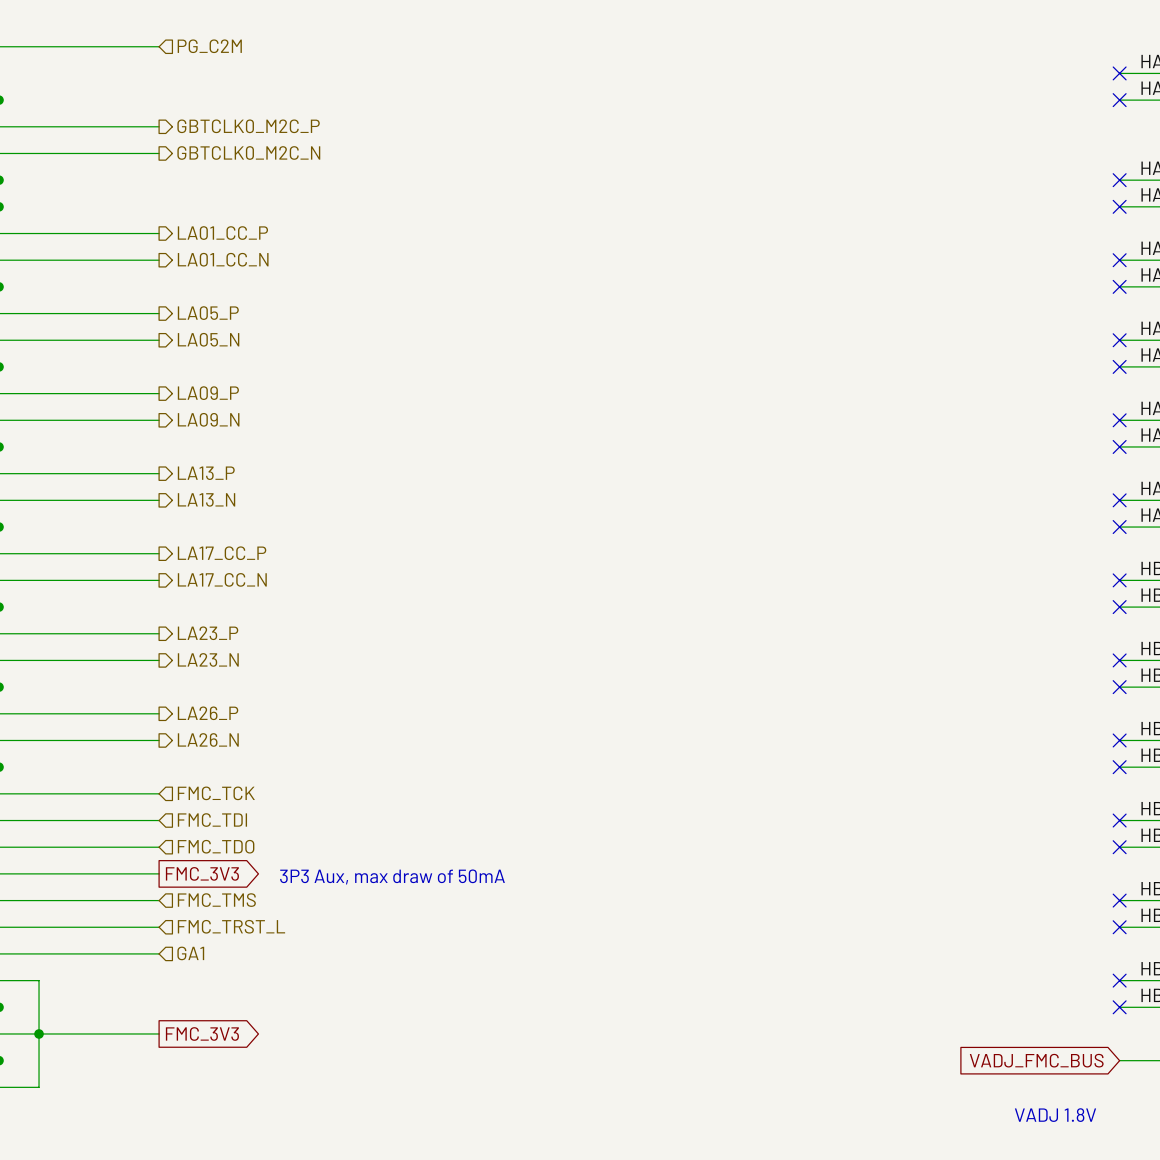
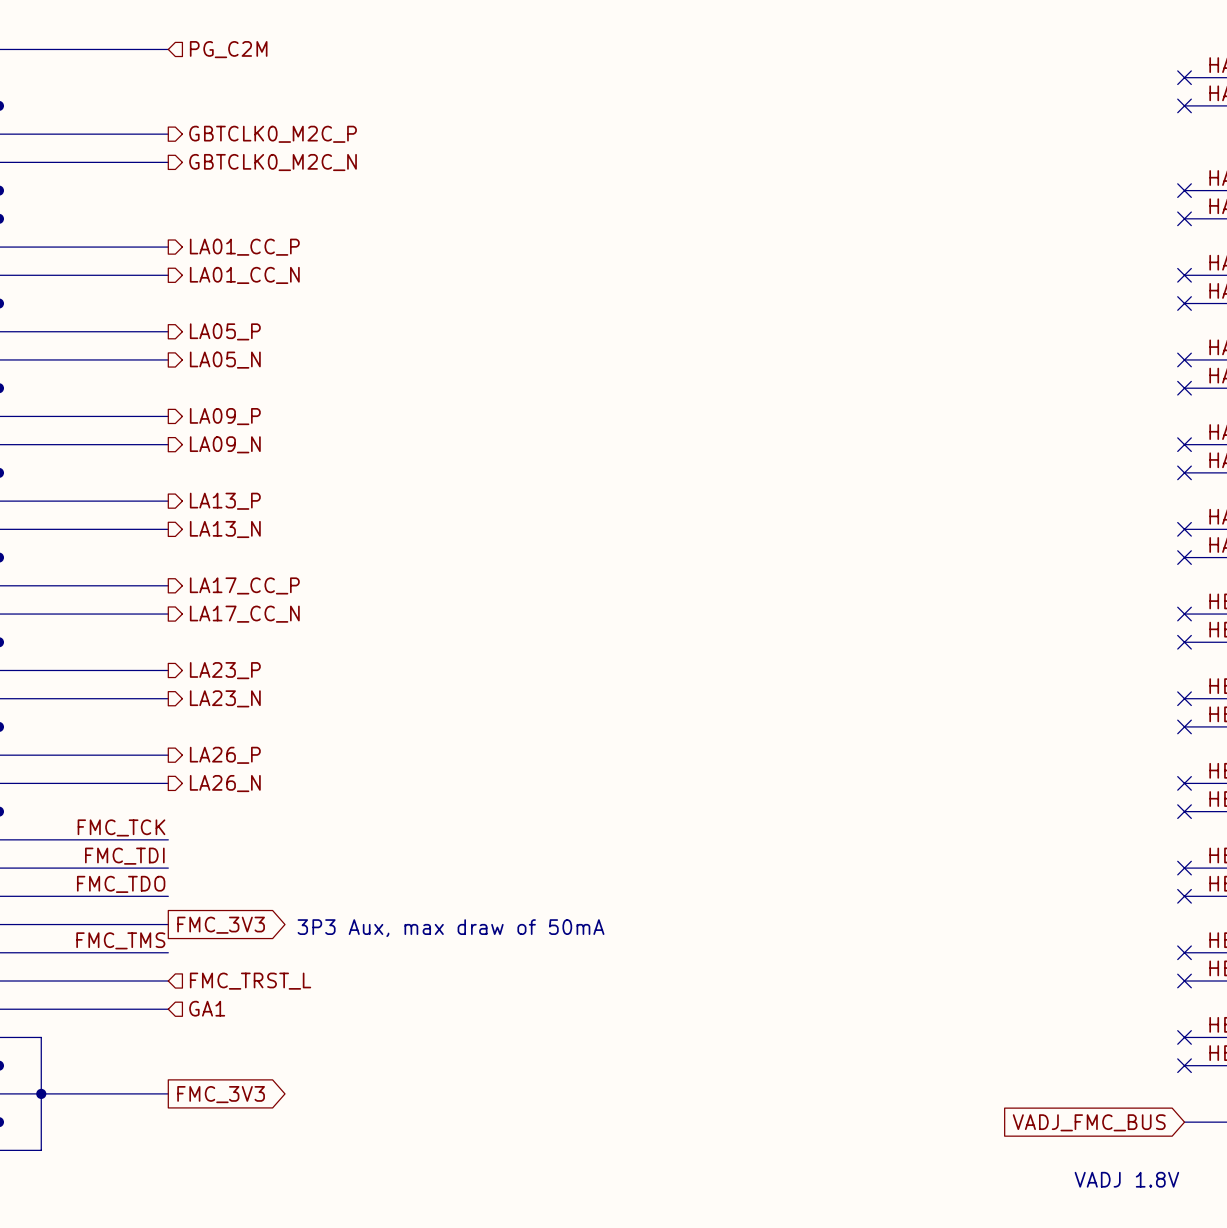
label: none -> FMC_TCK (121, 827)
hierarchical label: FMC_TCK (216, 793) -> none
label: none -> FMC_TDI (124, 856)
hierarchical label: FMC_TDI (212, 820) -> none
label: none -> FMC_TDO (121, 884)
hierarchical label: FMC_TDO (216, 846) -> none
label: none -> FMC_TMS (120, 940)
hierarchical label: FMC_TMS (216, 900) -> none

